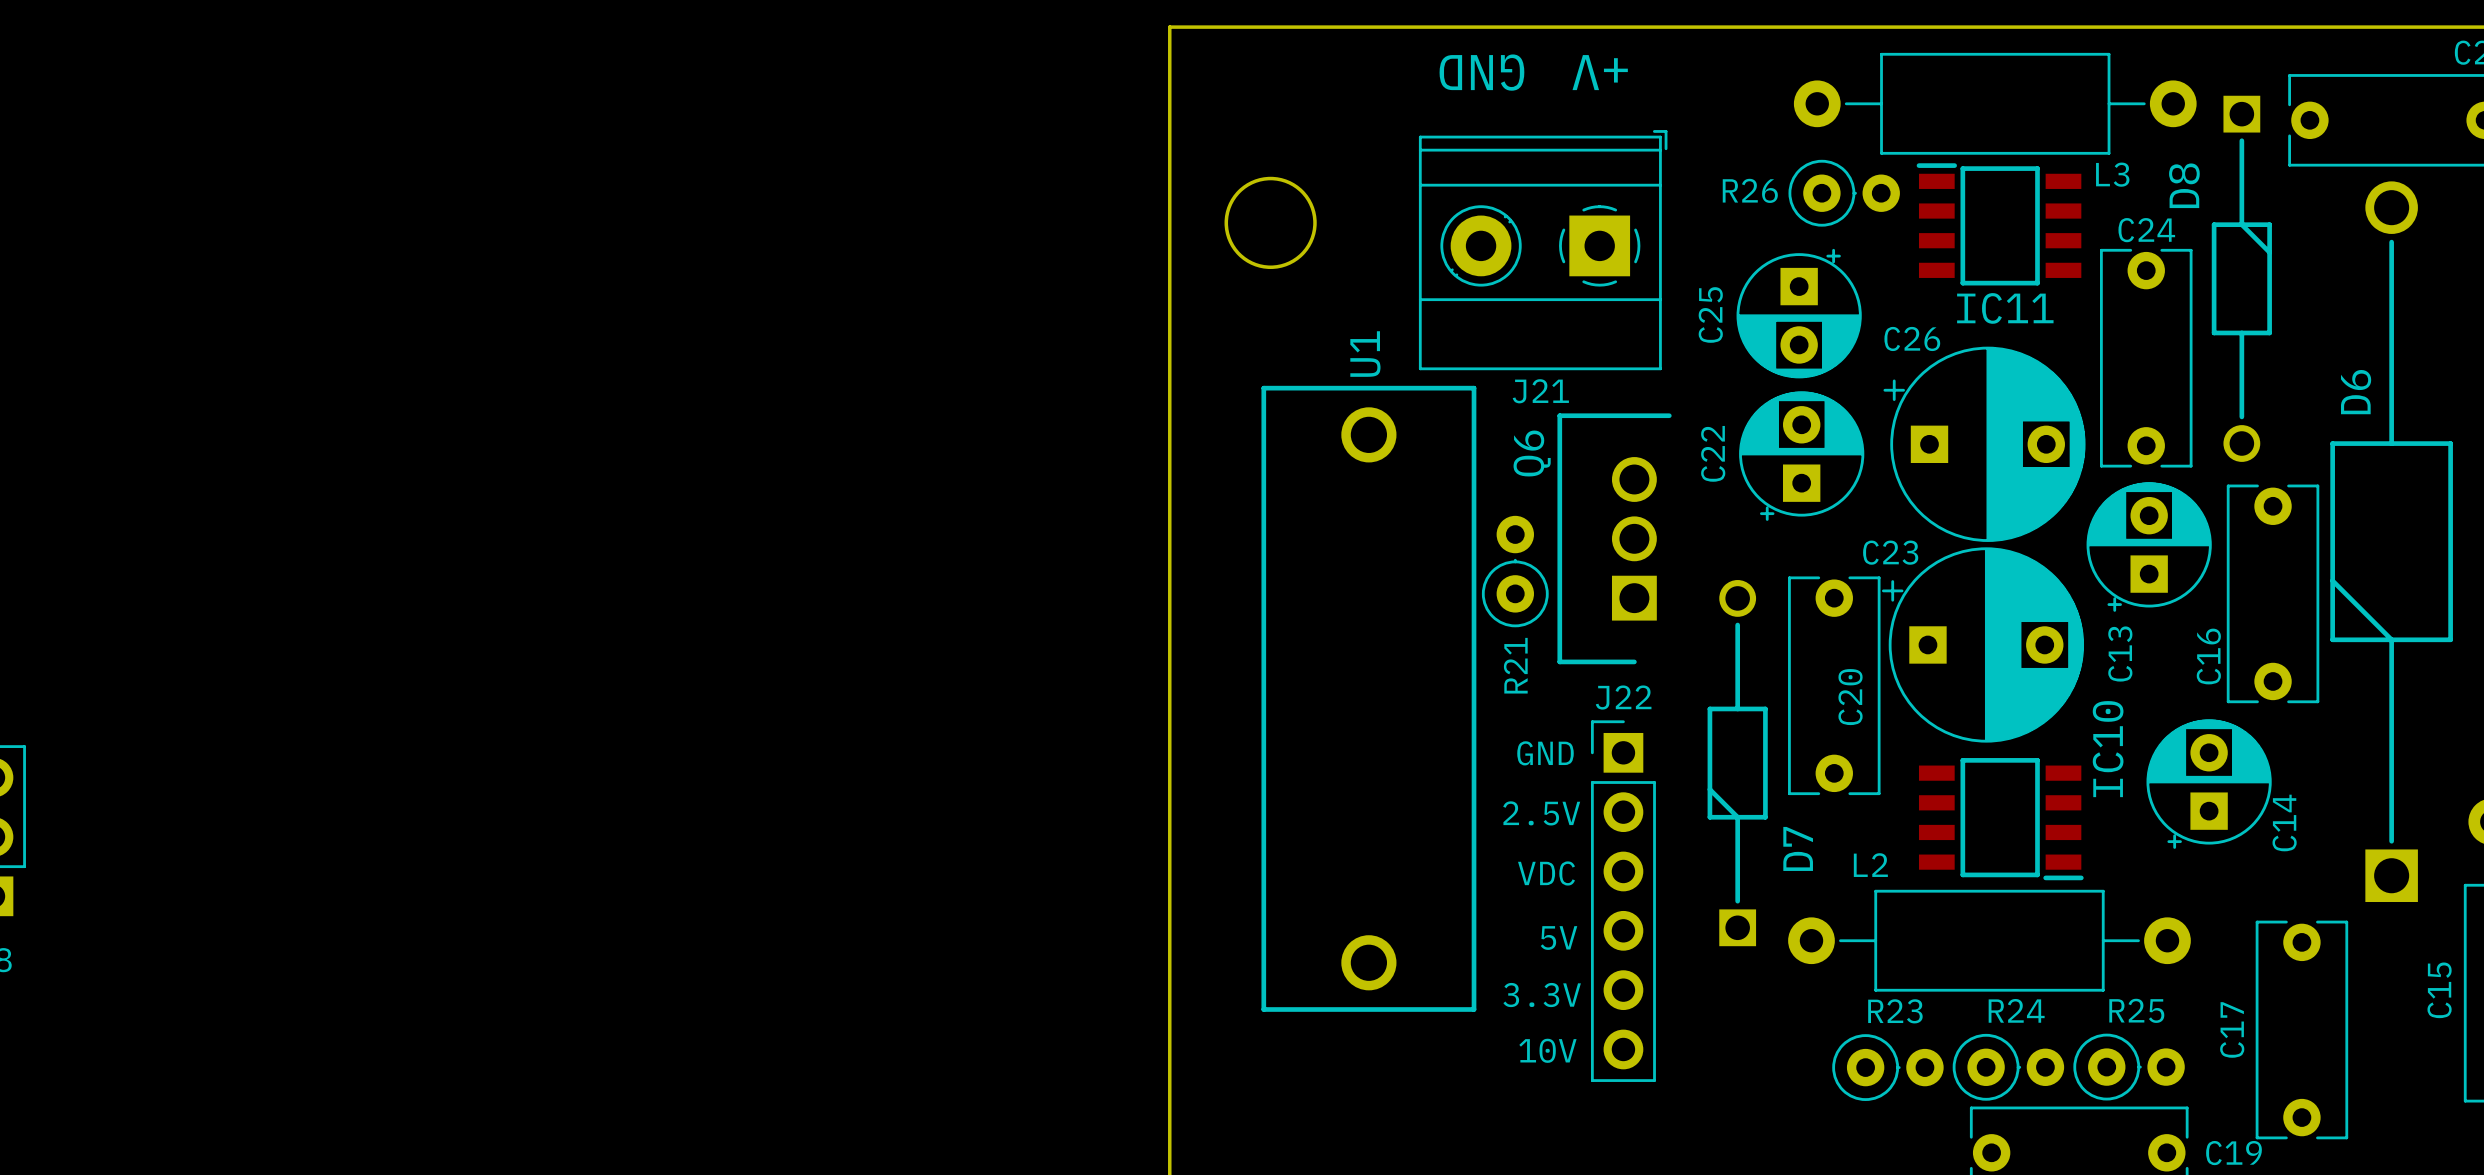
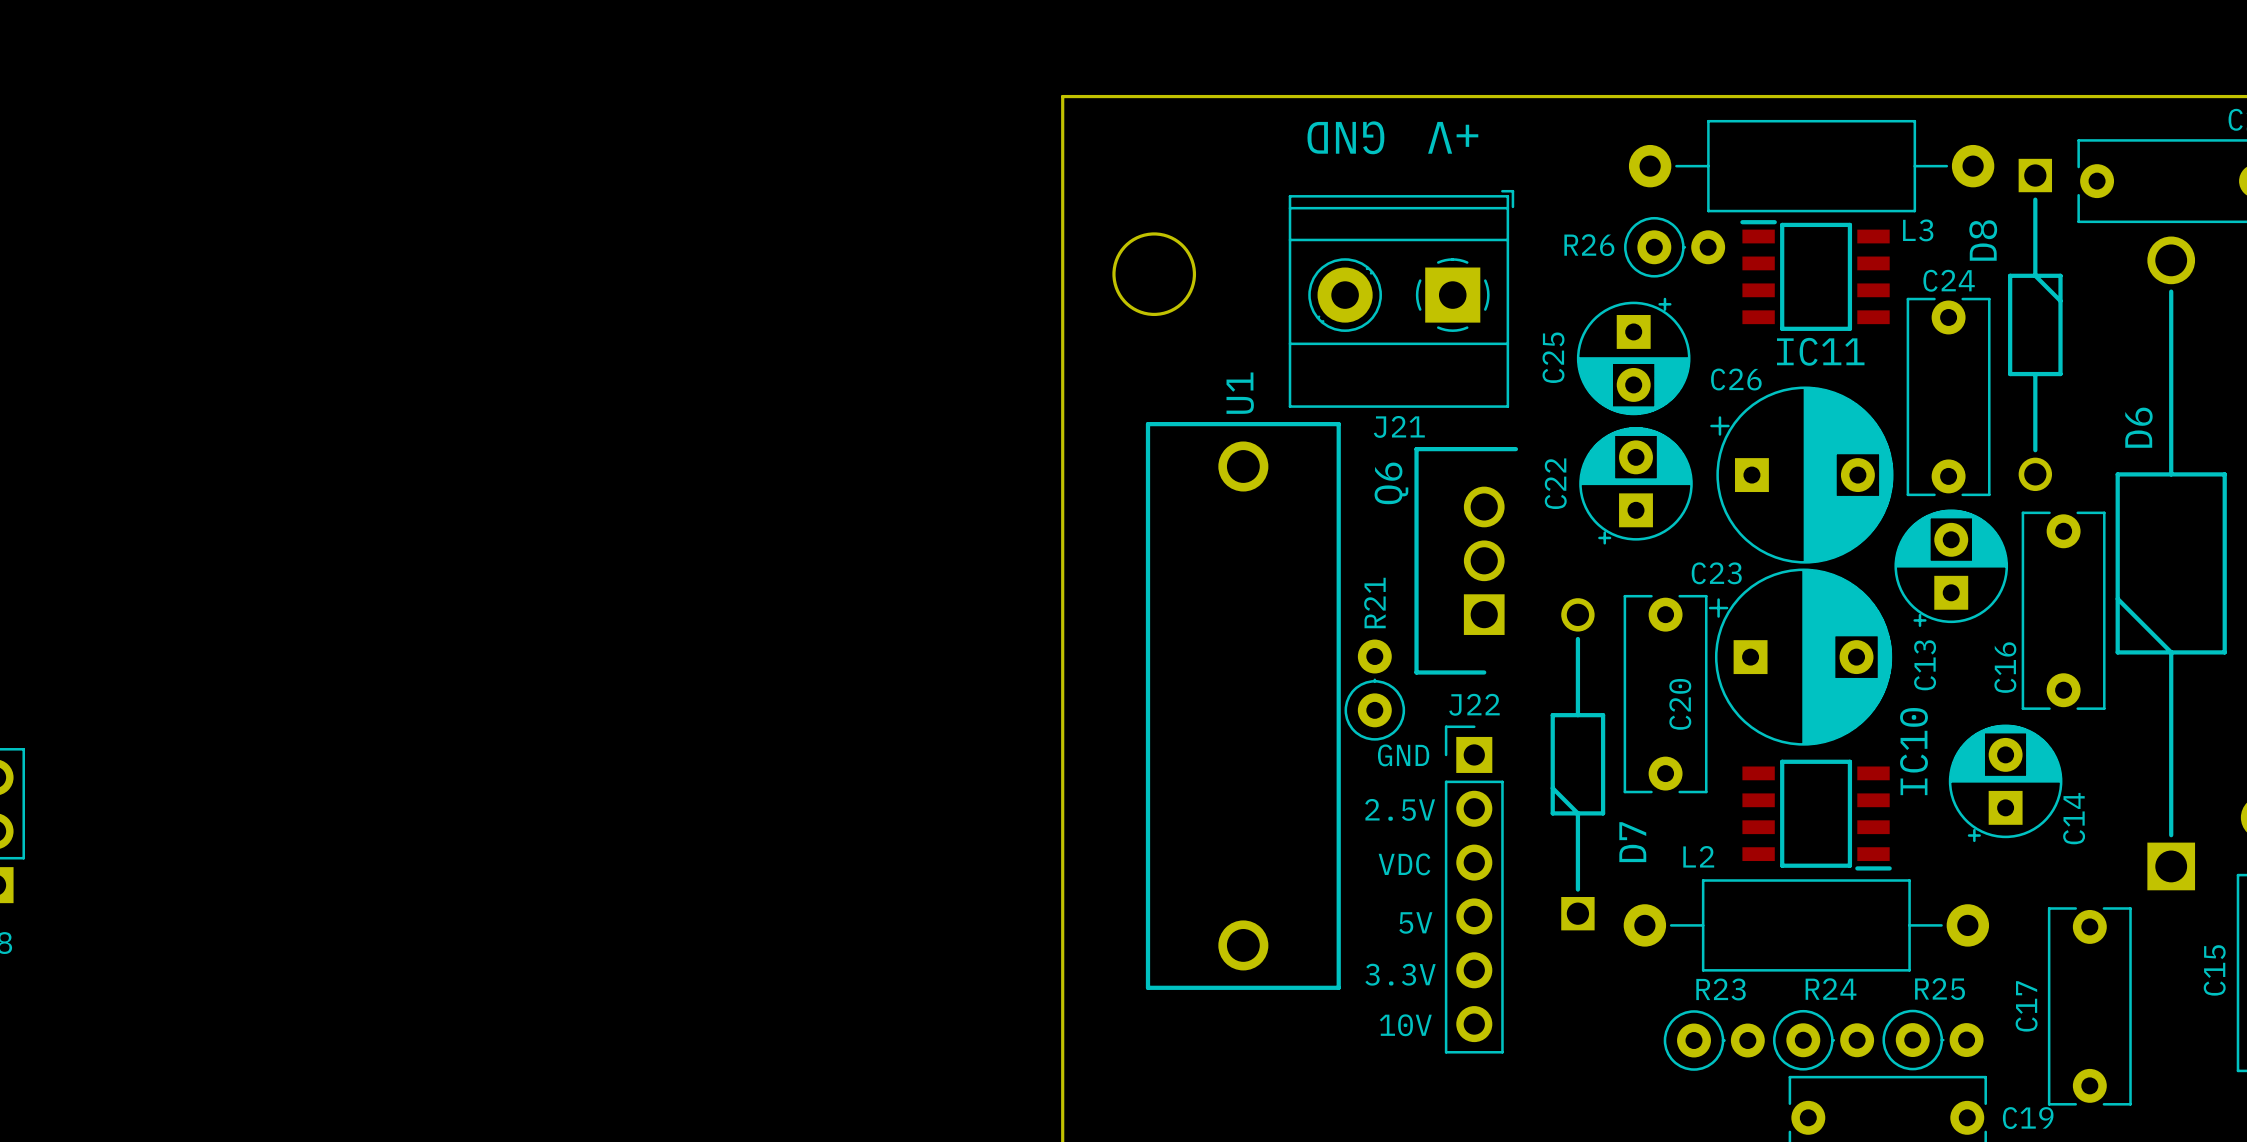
R21 position: (1515, 571) -> (1374, 690)
R21 name position: R21 (1515, 665) -> R21 (1374, 603)

